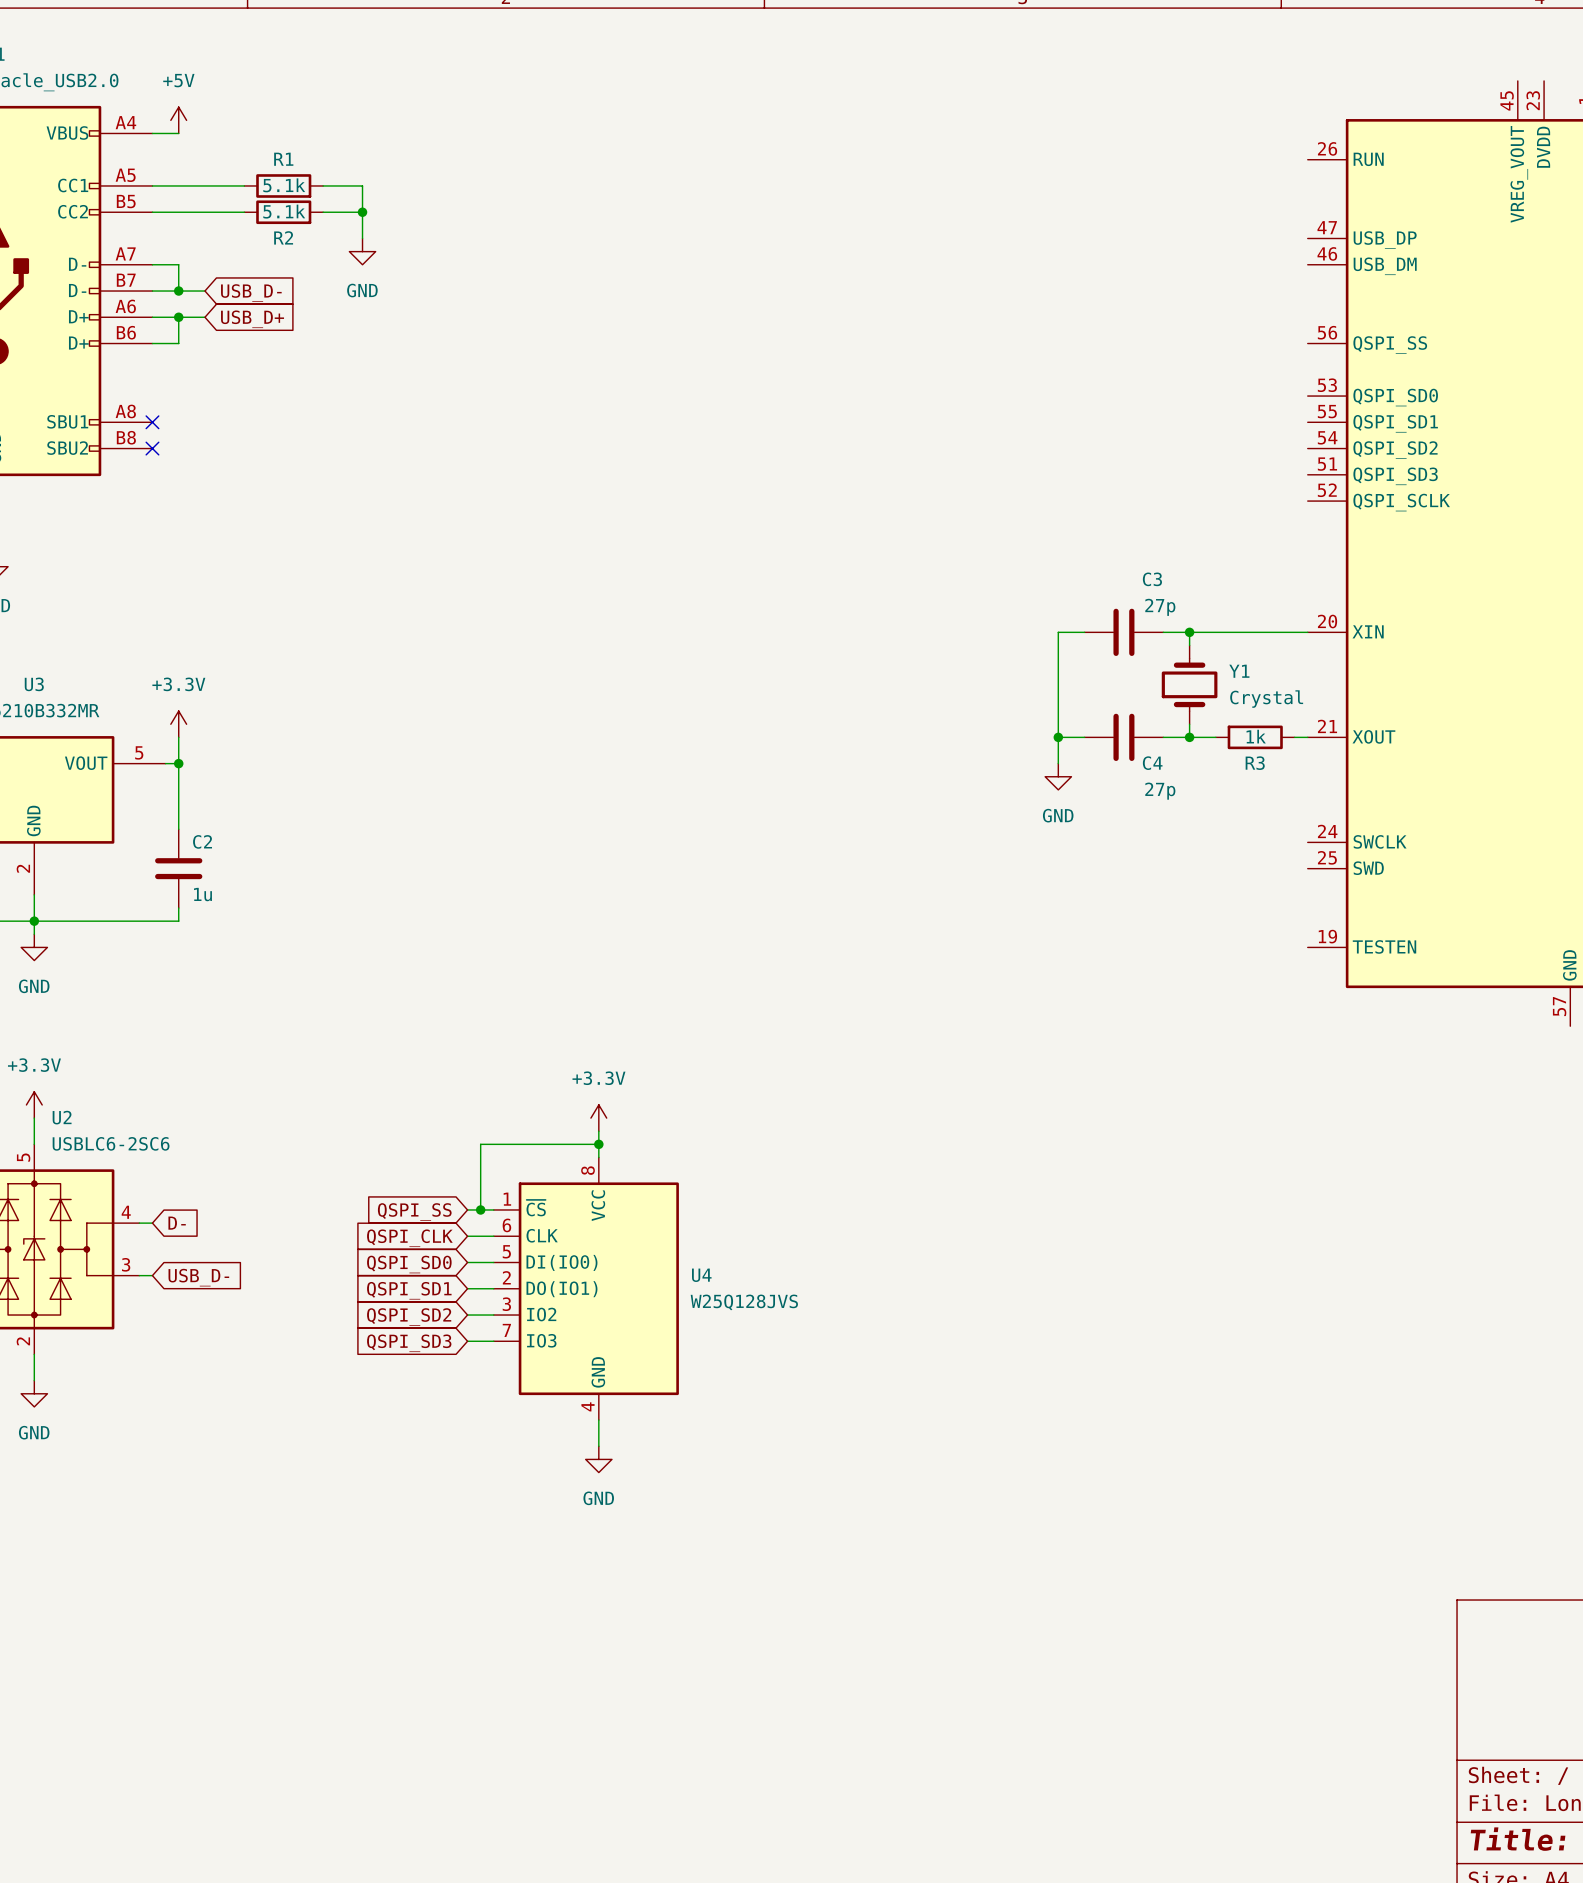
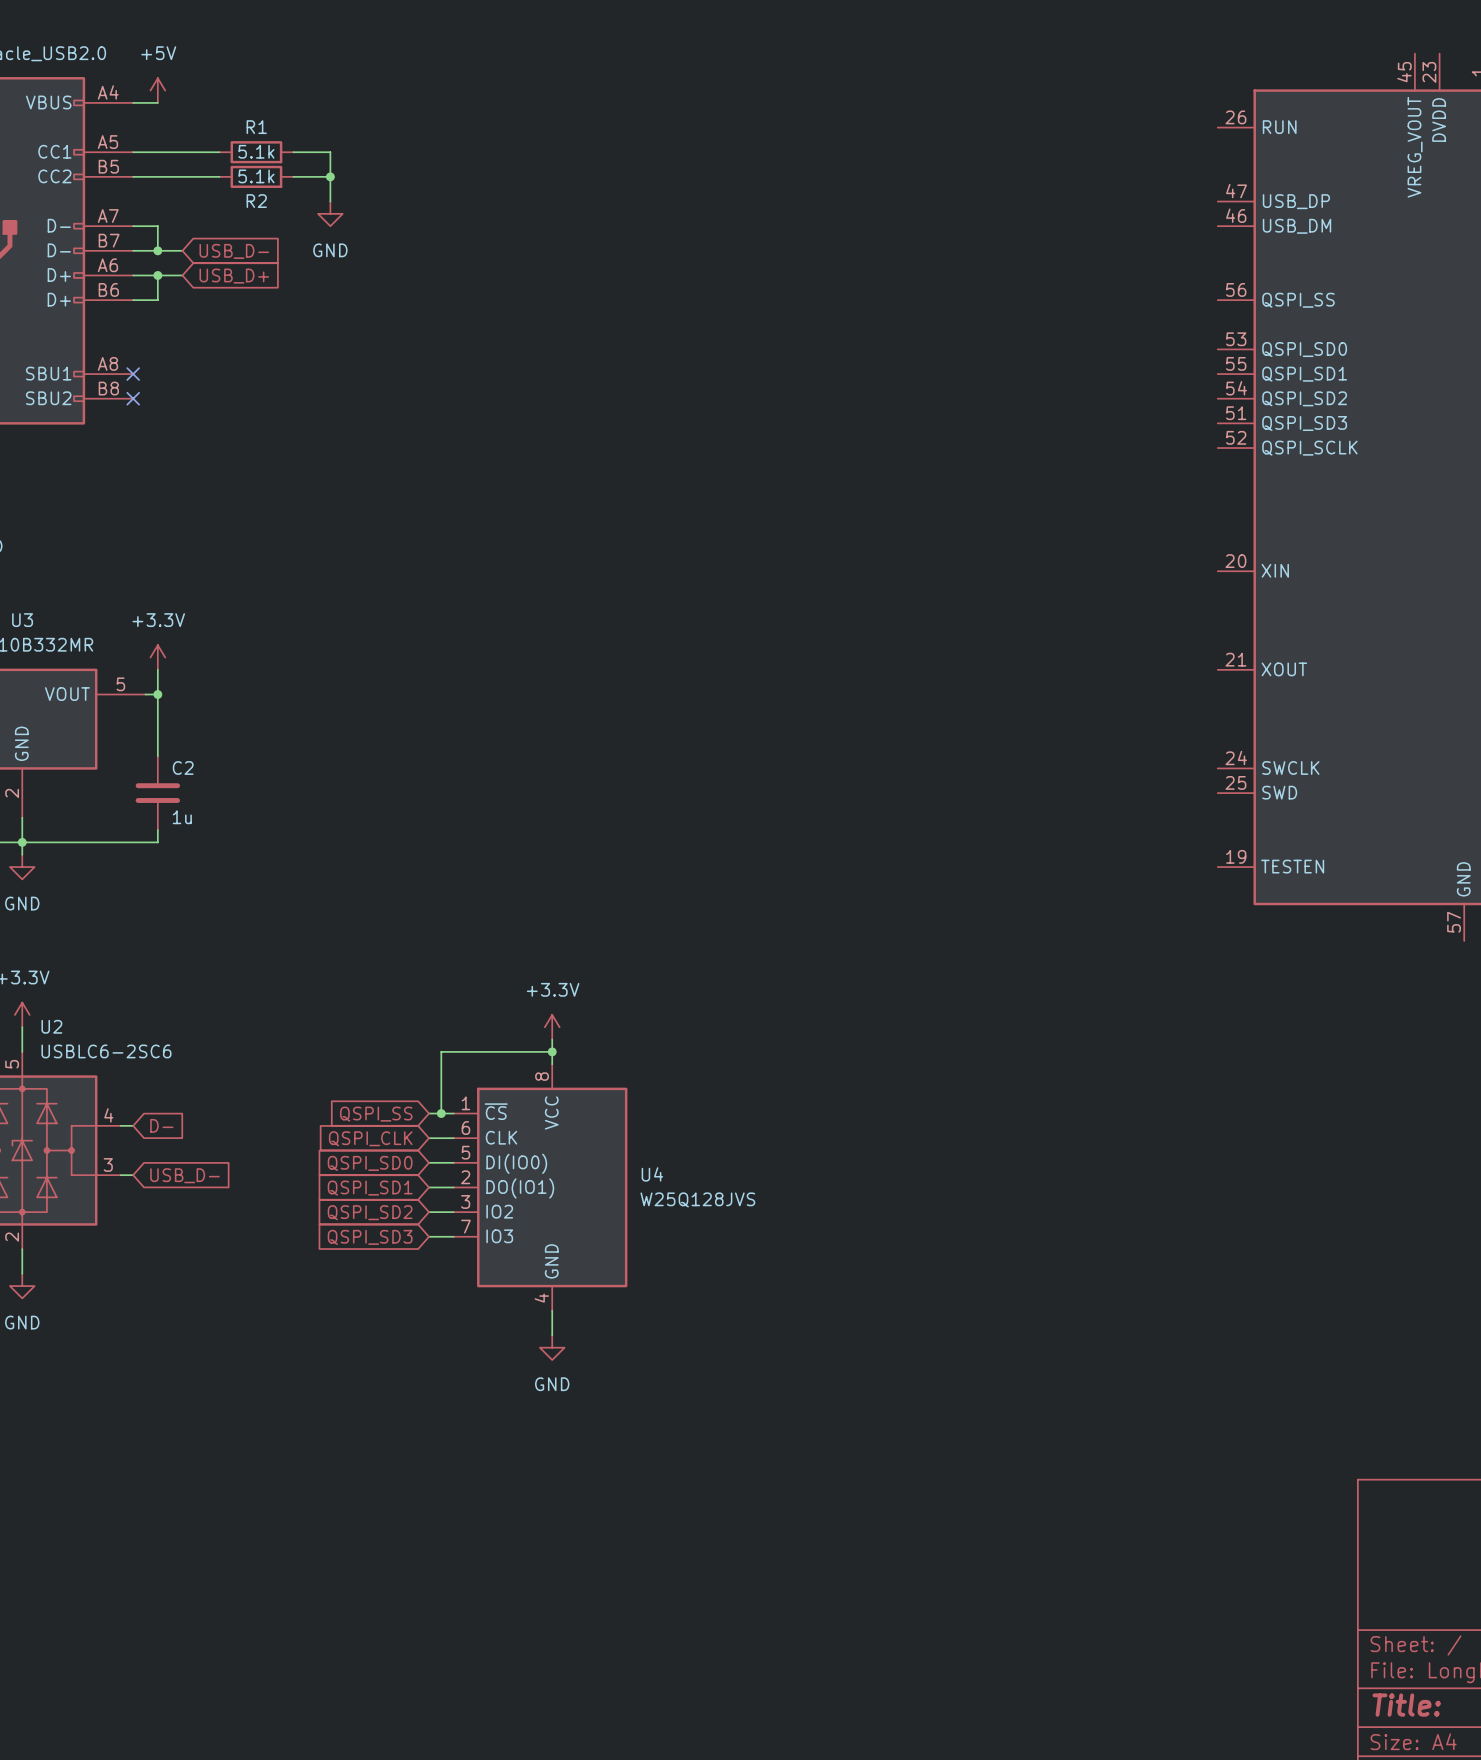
wire: (1084, 632) (1058, 632) (1058, 763) -> none
C3: 27p (1123, 632) -> none
wire: (1163, 632) (1307, 632) -> none
wire: (1189, 632) (1189, 645) -> none
junction: (1189, 632) -> none
Y1: Crystal (1189, 684) -> none
wire: (1189, 724) (1189, 737) -> none
wire: (1058, 737) (1084, 737) -> none
junction: (1058, 737) -> none
C4: 27p (1123, 737) -> none
wire: (1163, 737) (1215, 737) -> none
junction: (1189, 737) -> none
R3: 1k (1255, 737) -> none
wire: (1294, 737) (1307, 737) -> none
power symbol: GND (1058, 776) -> none

